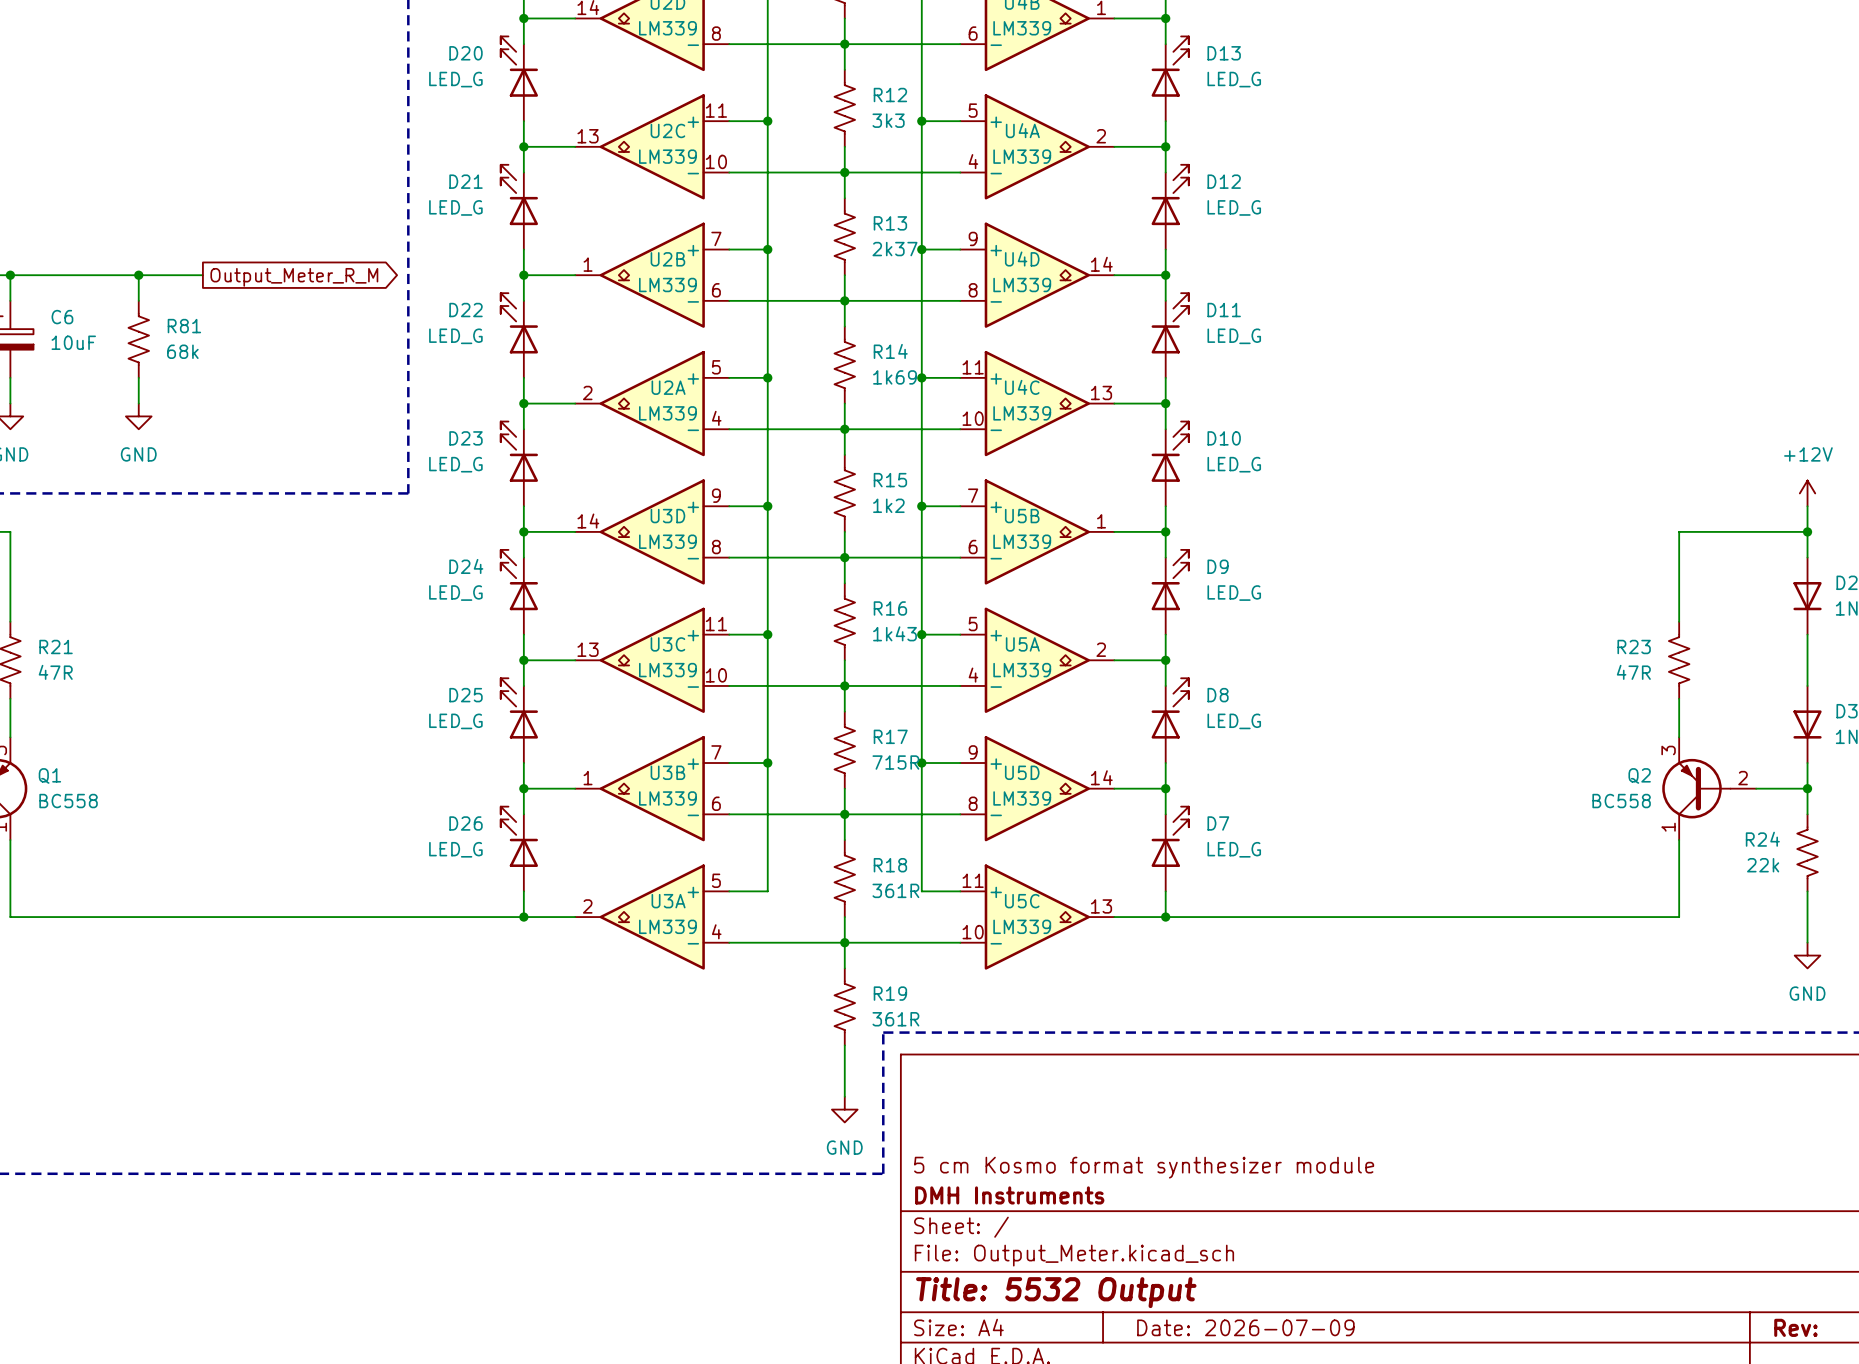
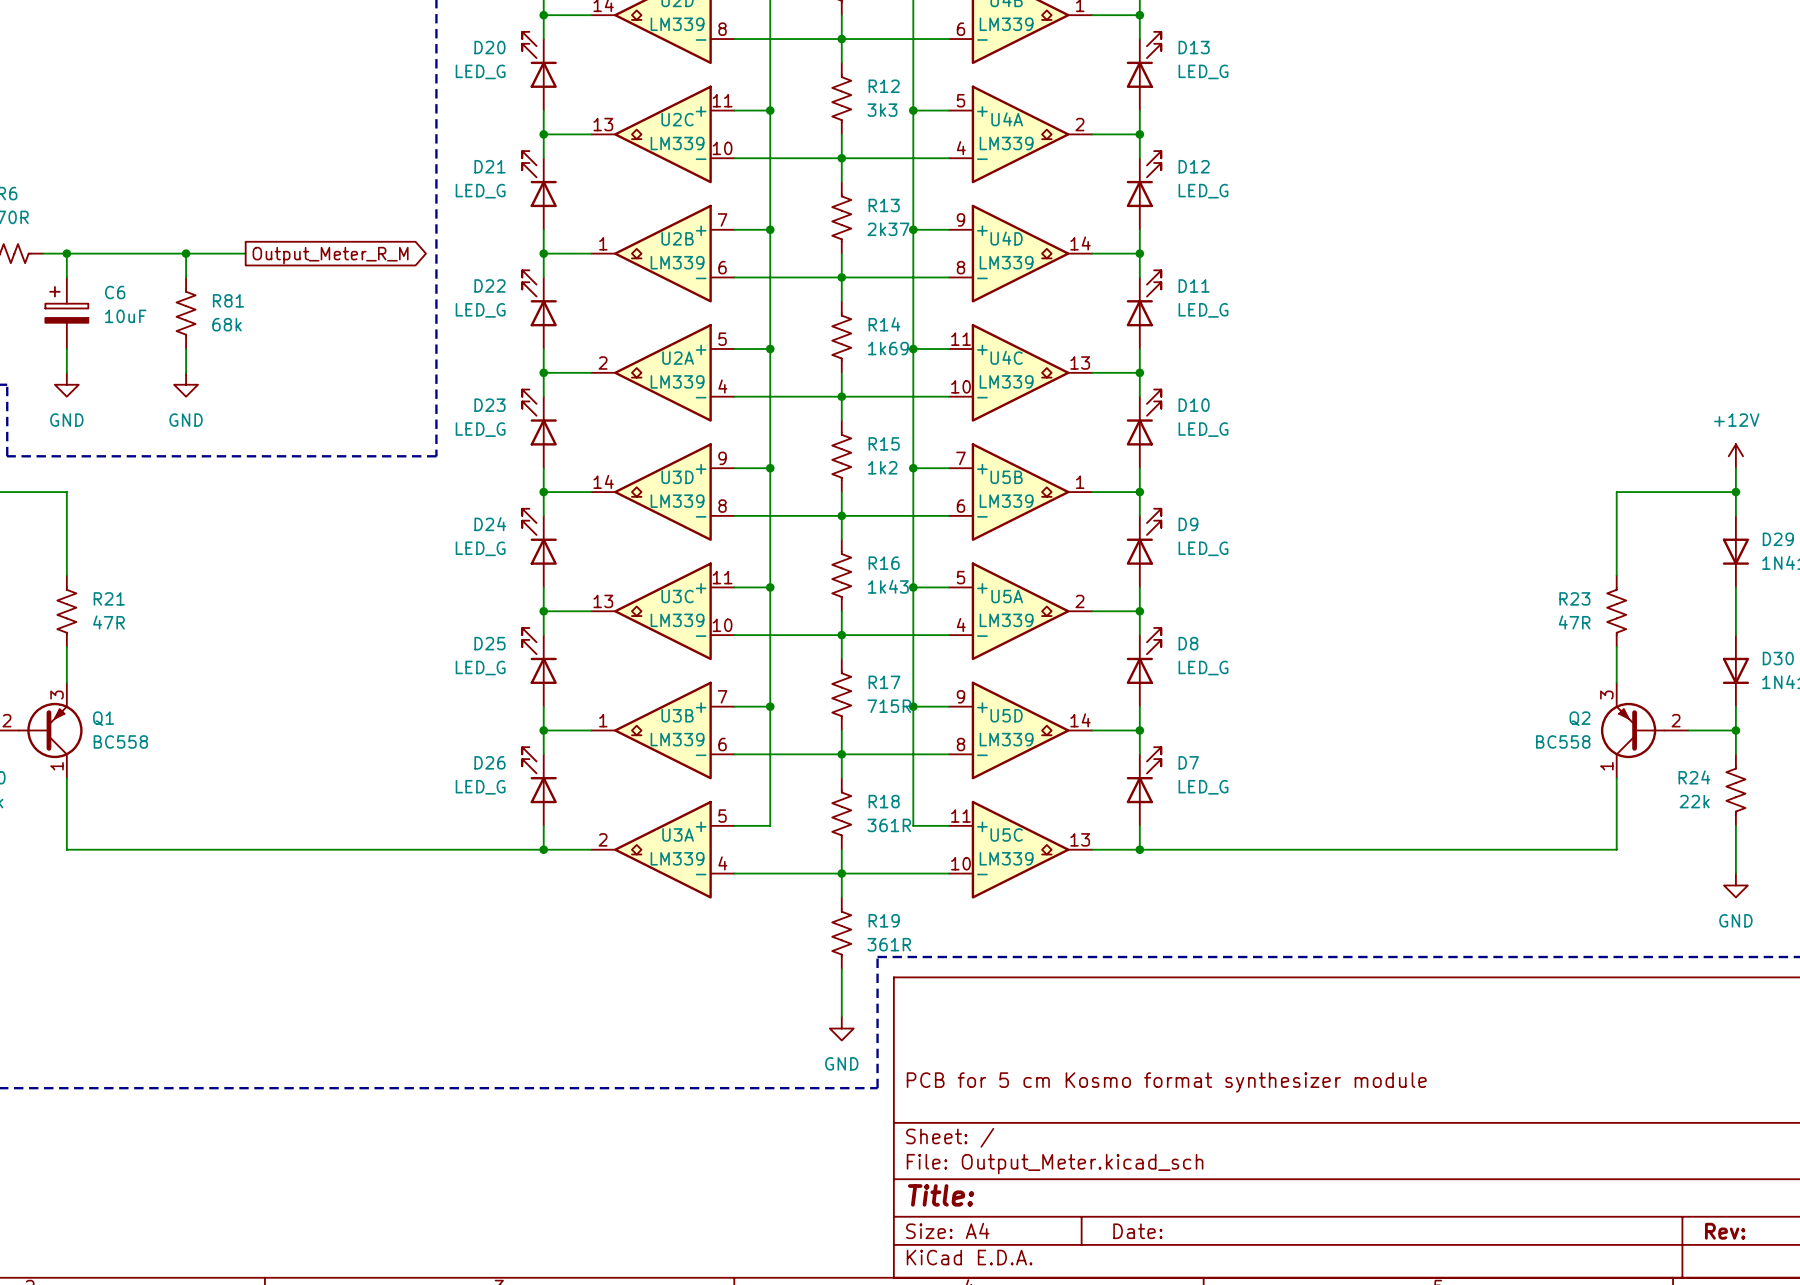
title block: 5 cm Kosmo format synthesizer module (1144, 1167) -> PCB for 5 cm Kosmo format synthesizer module (1166, 1082)
title block: DMH Instruments (1009, 1195) -> none
title block: Title: 5532 Output (1056, 1292) -> Title: (941, 1195)
title block: Date: 2026-07-09 (1245, 1327) -> Date: (1137, 1231)

